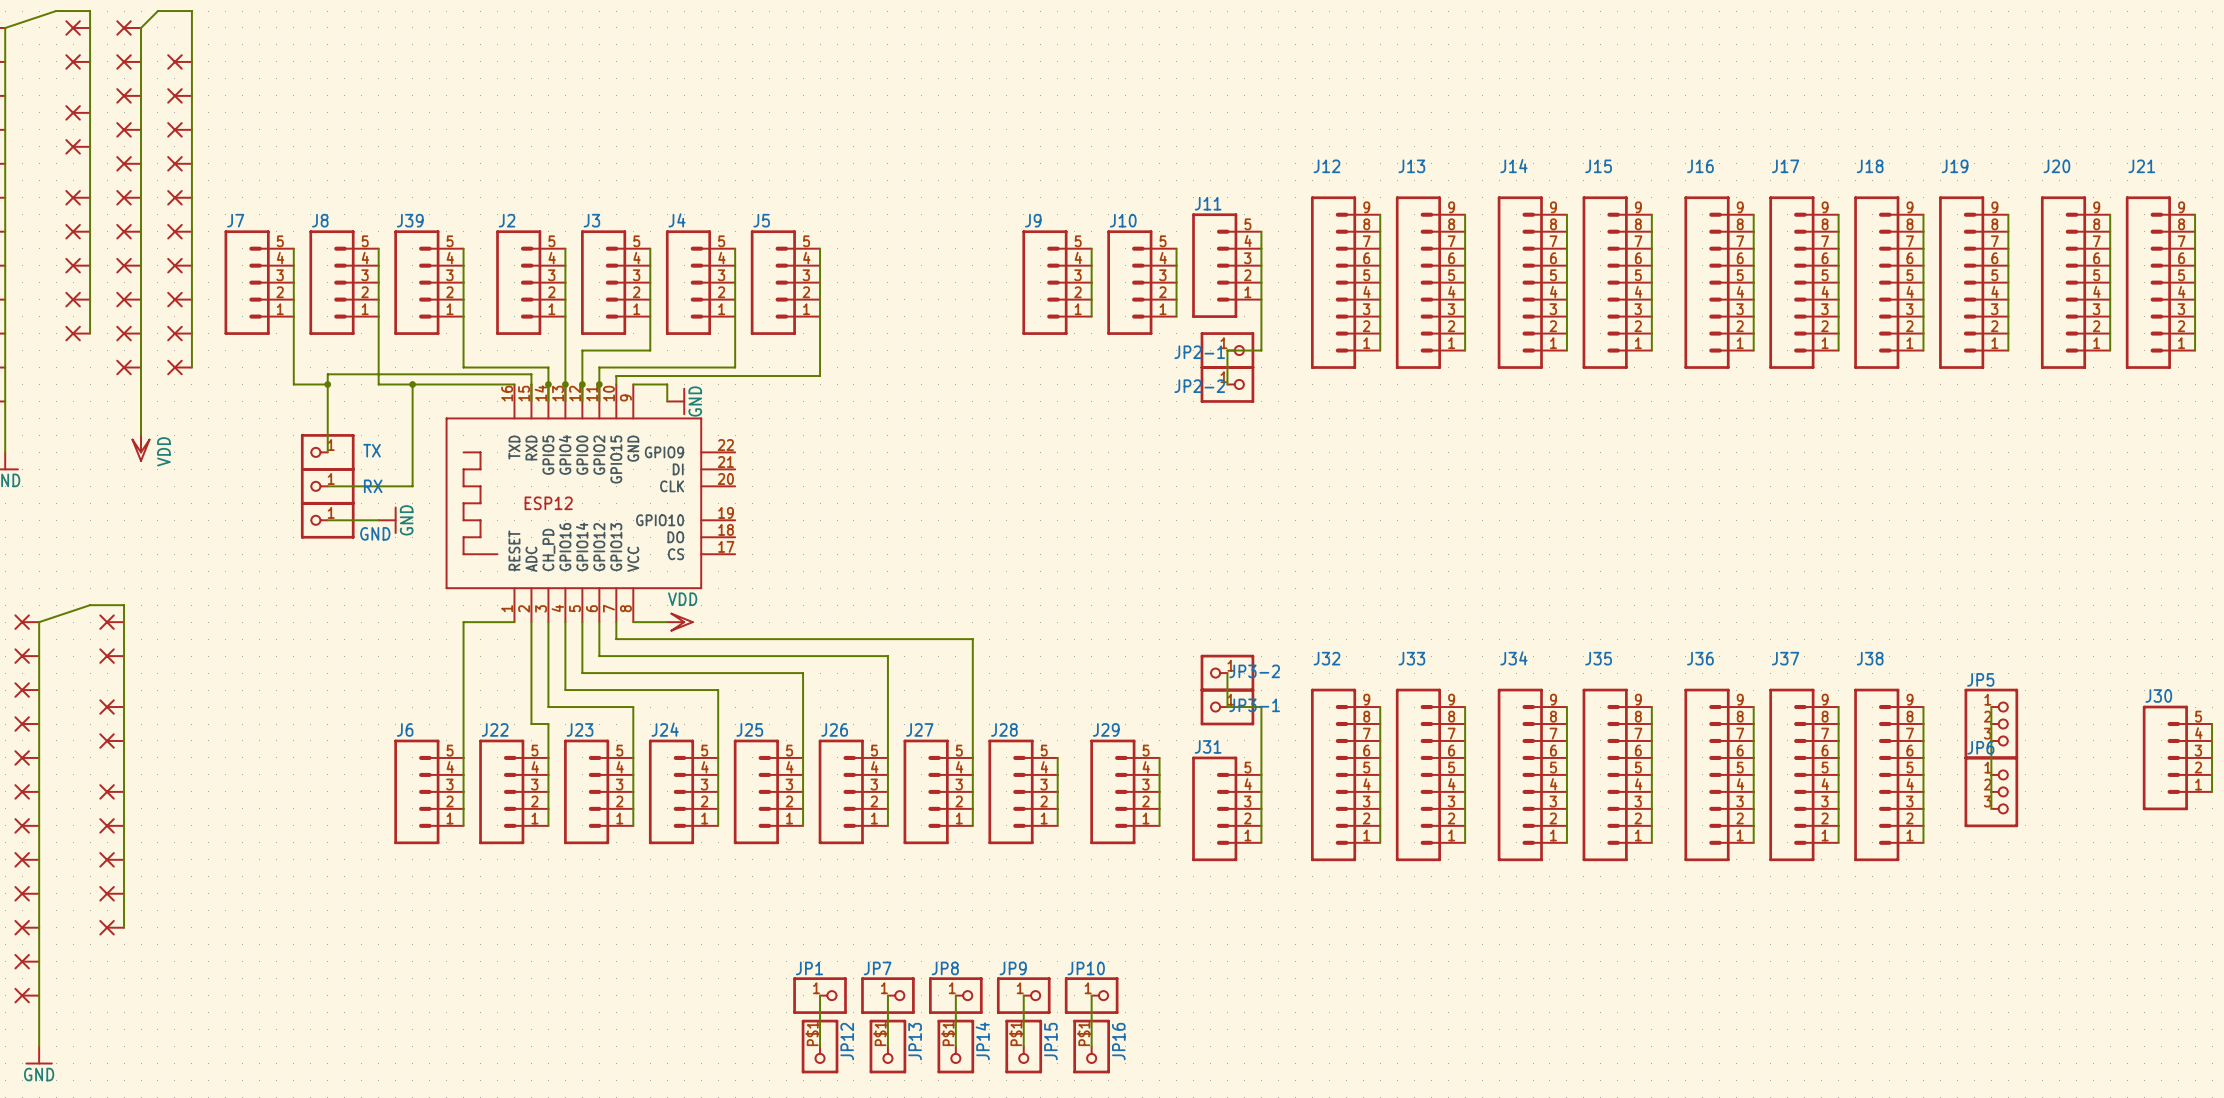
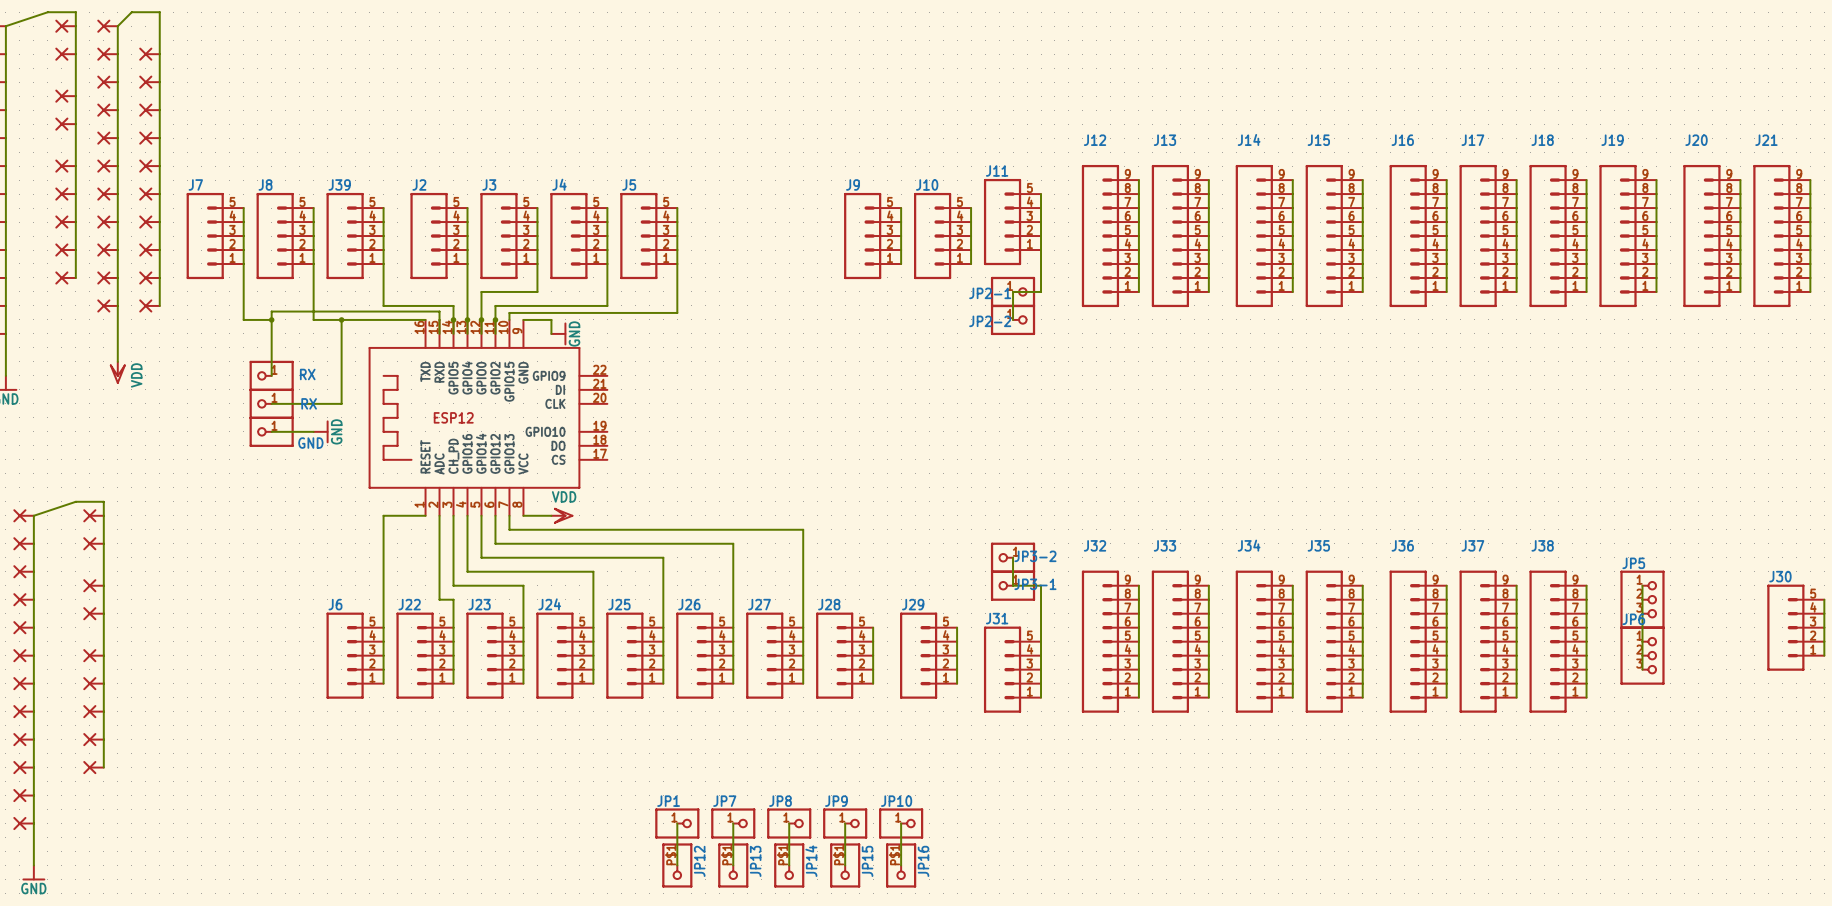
TX name: TX (372, 450) -> RX (307, 374)

